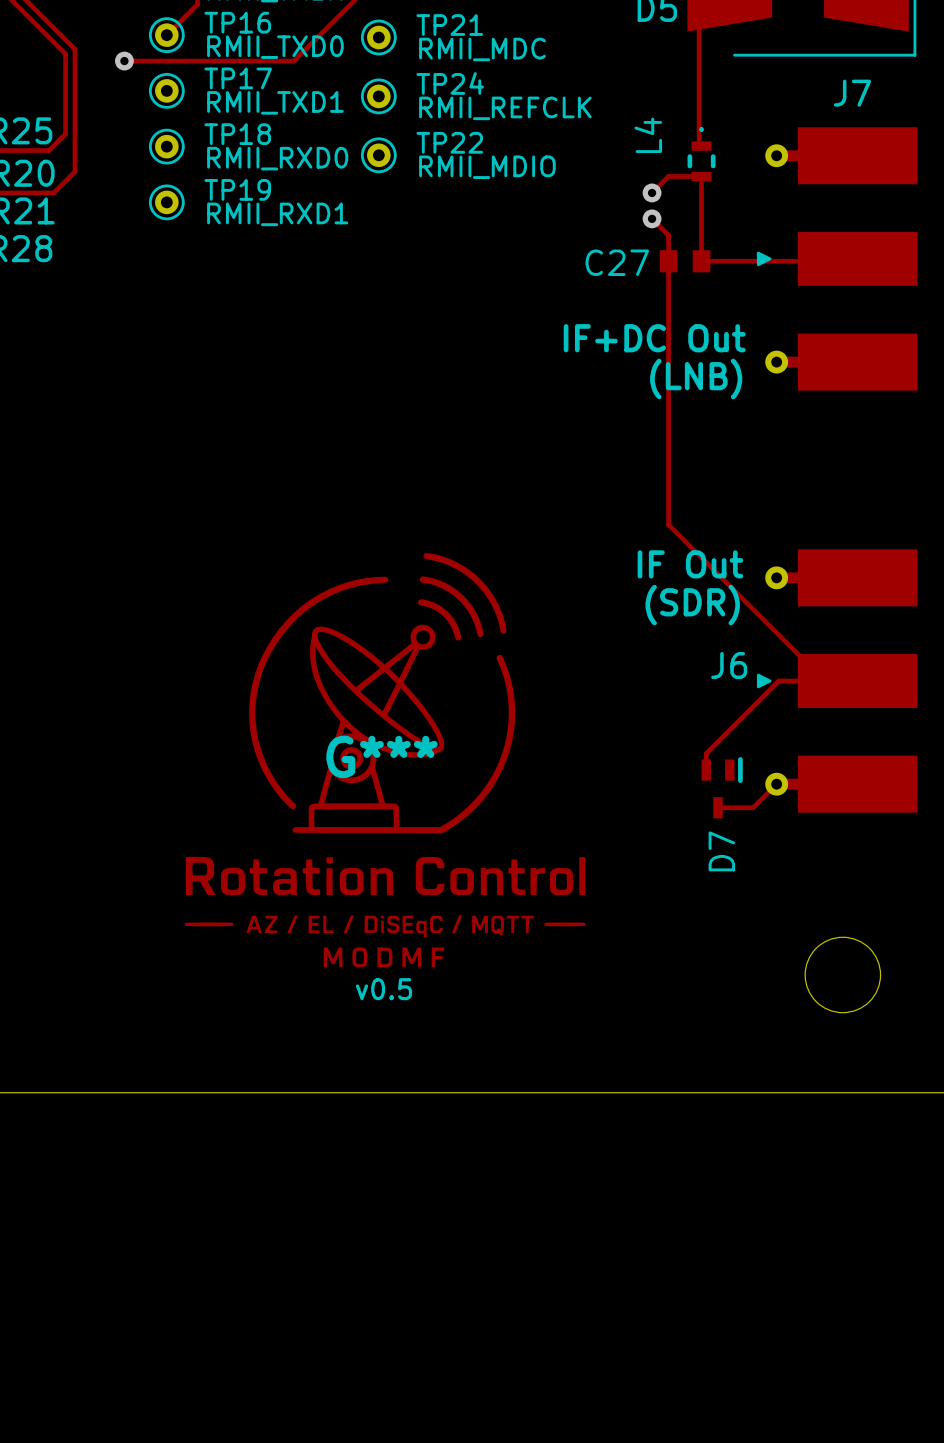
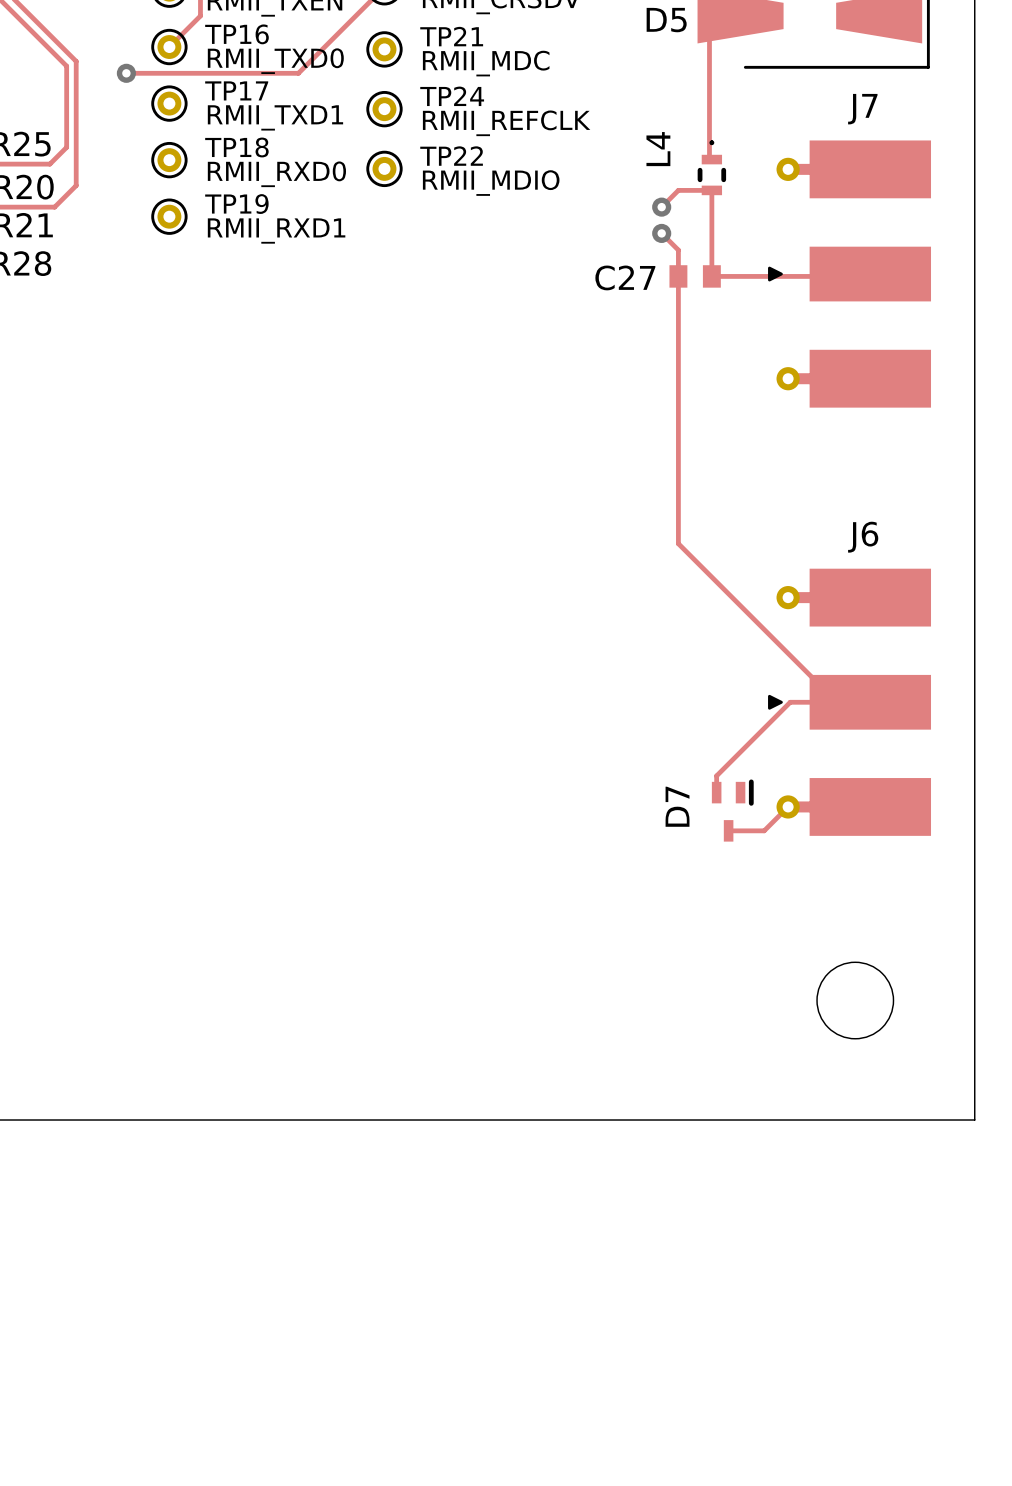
text: IF+DC Out (654, 338) -> none
text: (LNB) (696, 378) -> none
text: IF Out (690, 564) -> none
text: (SDR) (692, 605) -> none
J6 name position: J6 (729, 665) -> J6 (863, 537)
G***: (385, 760) -> none
D7 name position: D7 (721, 851) -> D7 (677, 806)
text: v0.5 (384, 989) -> none

